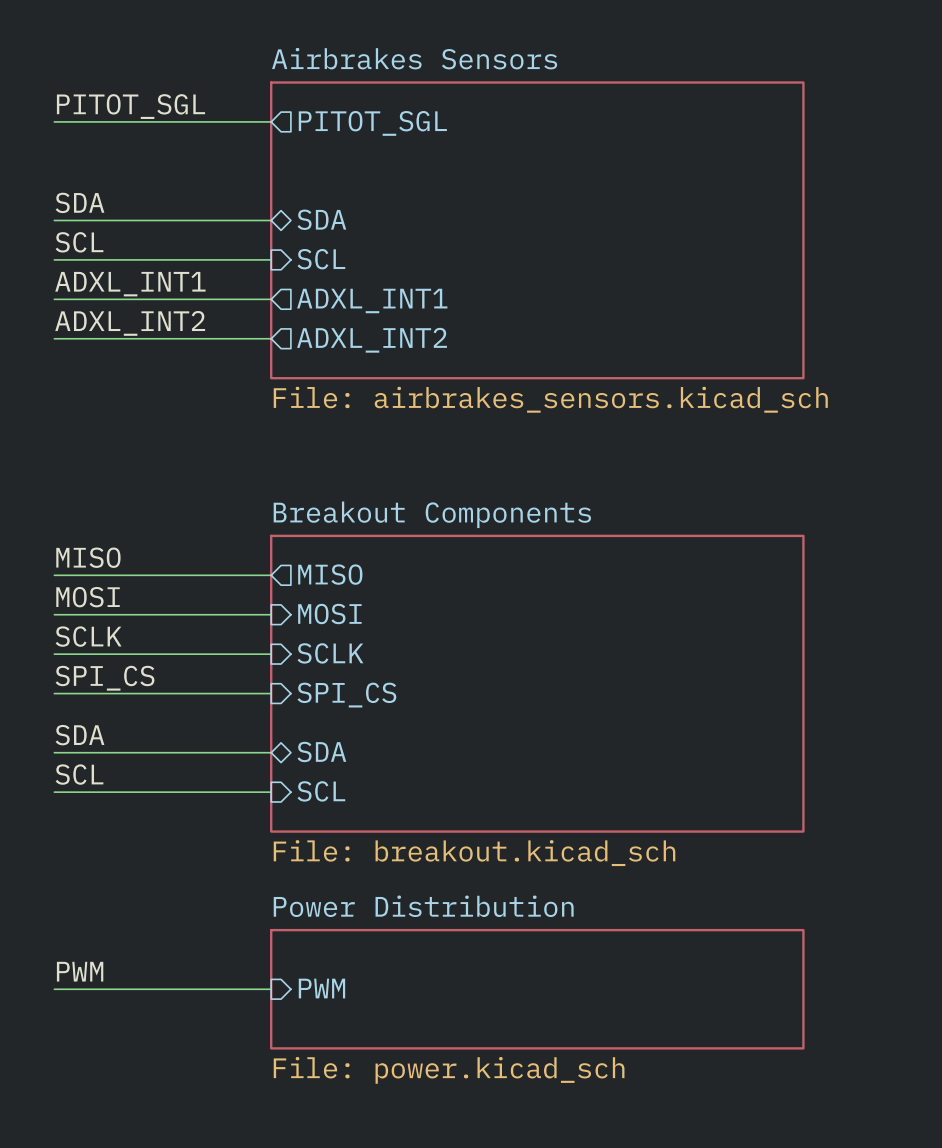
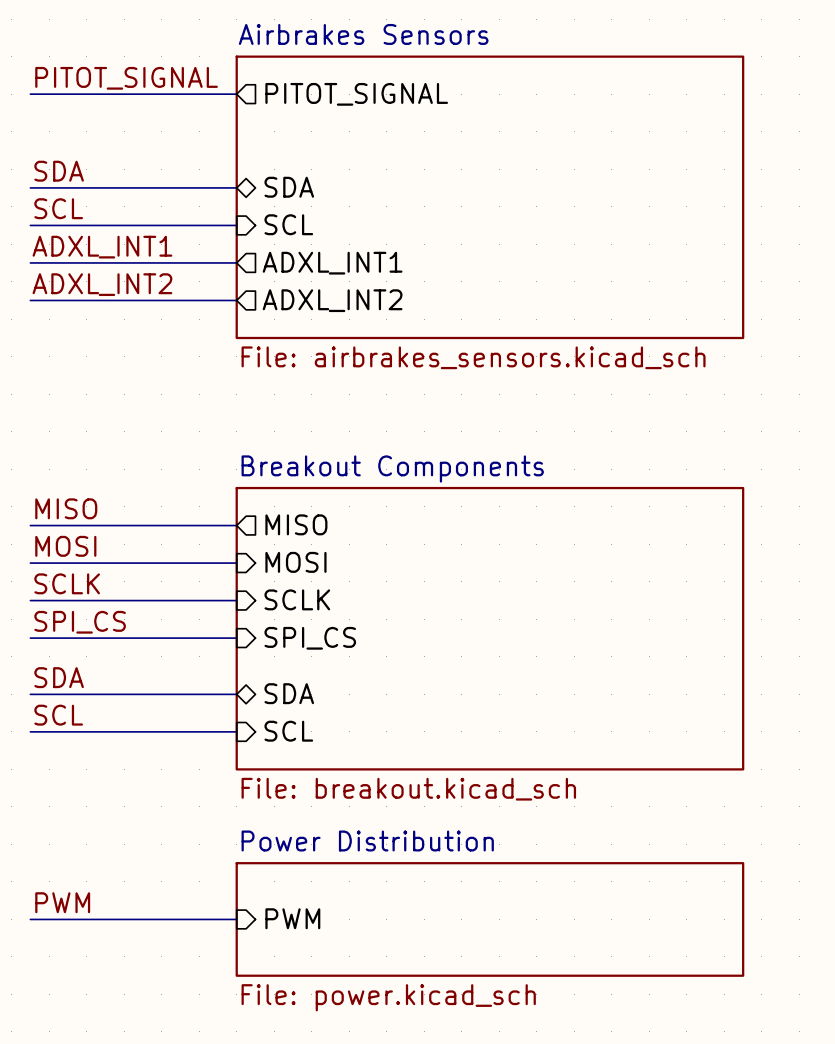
label: PITOT_SGL (130, 106) -> PITOT_SIGNAL (126, 78)
sheet pin: PITOT_SGL (372, 123) -> PITOT_SIGNAL (356, 94)

